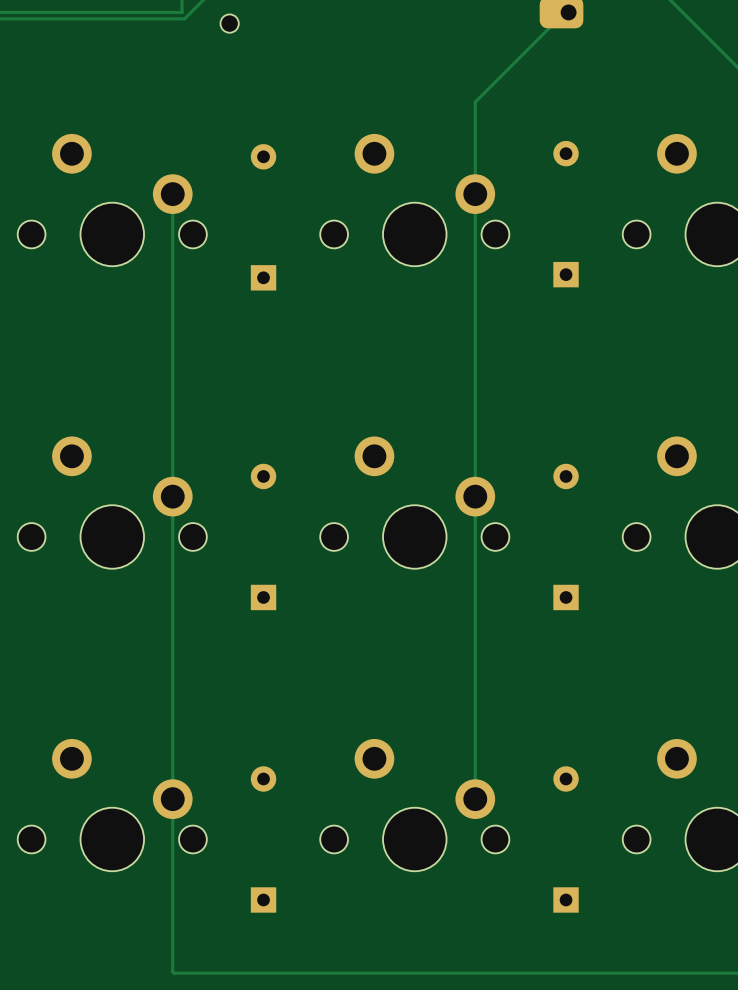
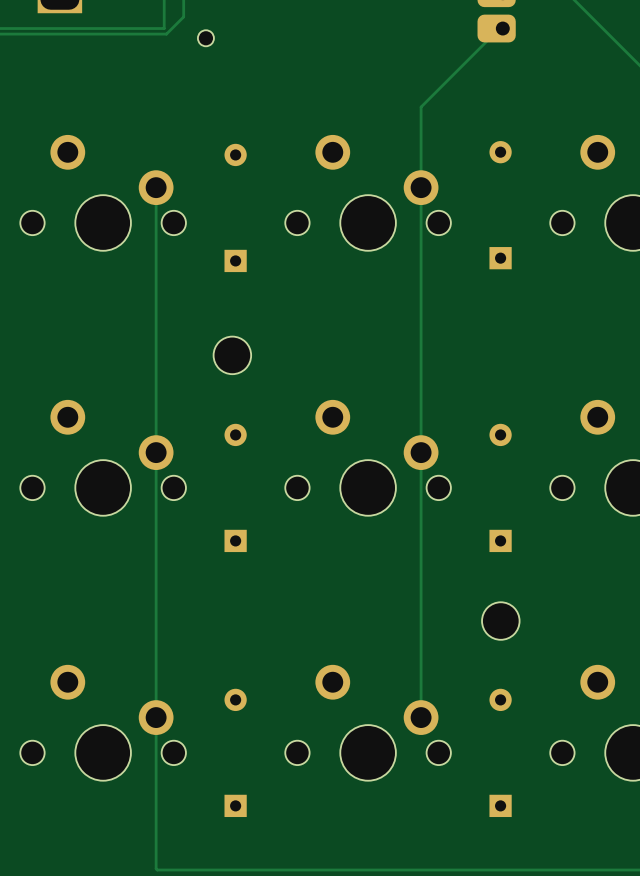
part: none -> (232, 355)
part: none -> (500, 621)

